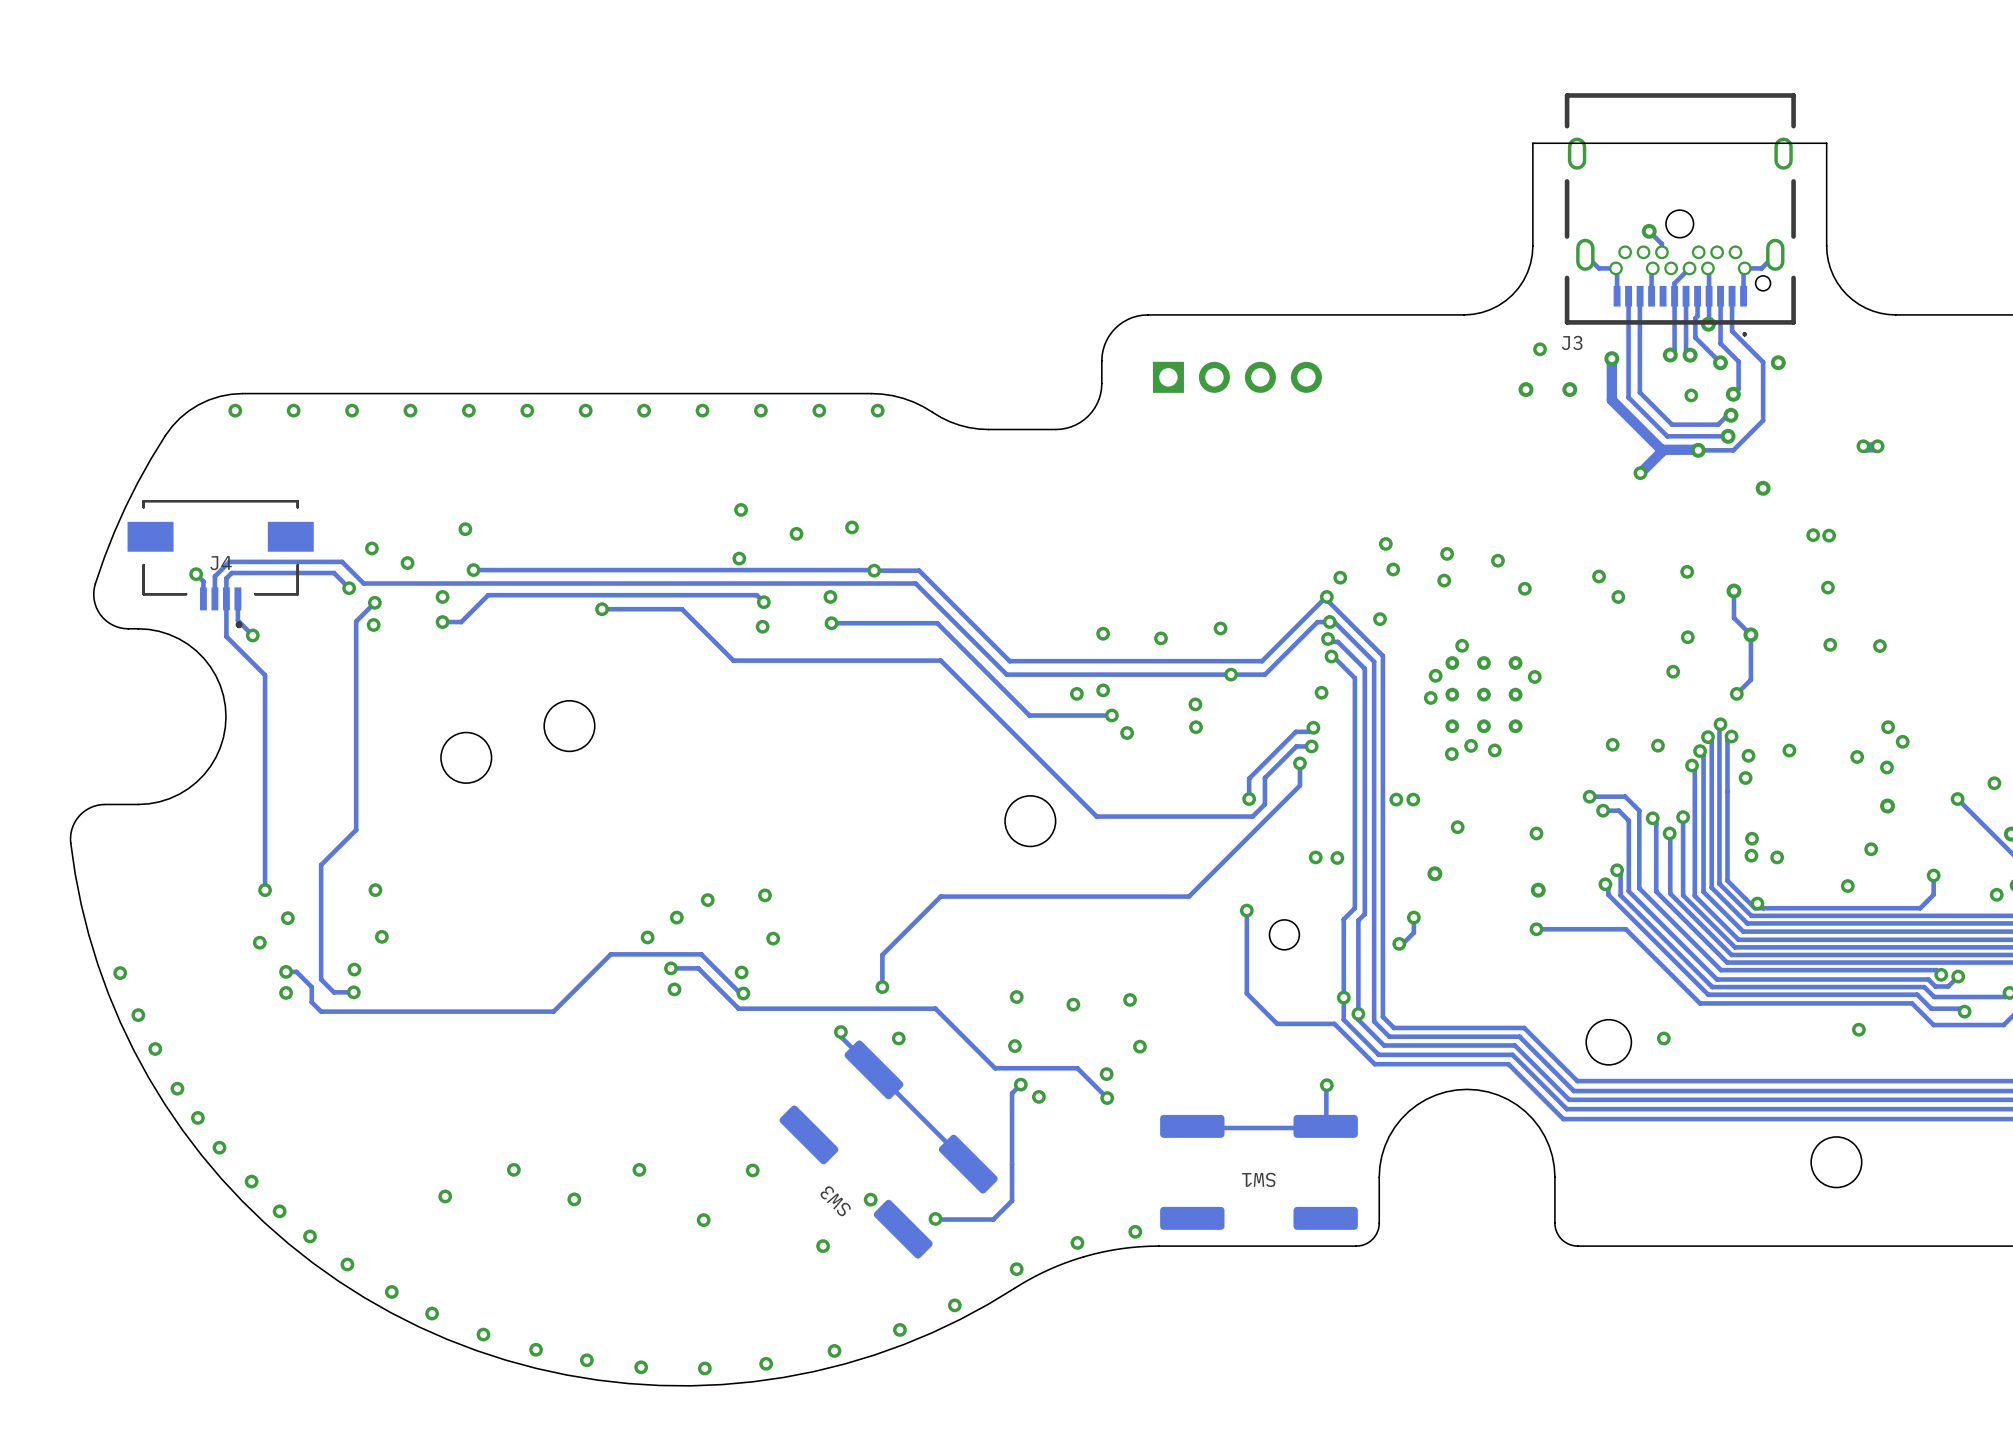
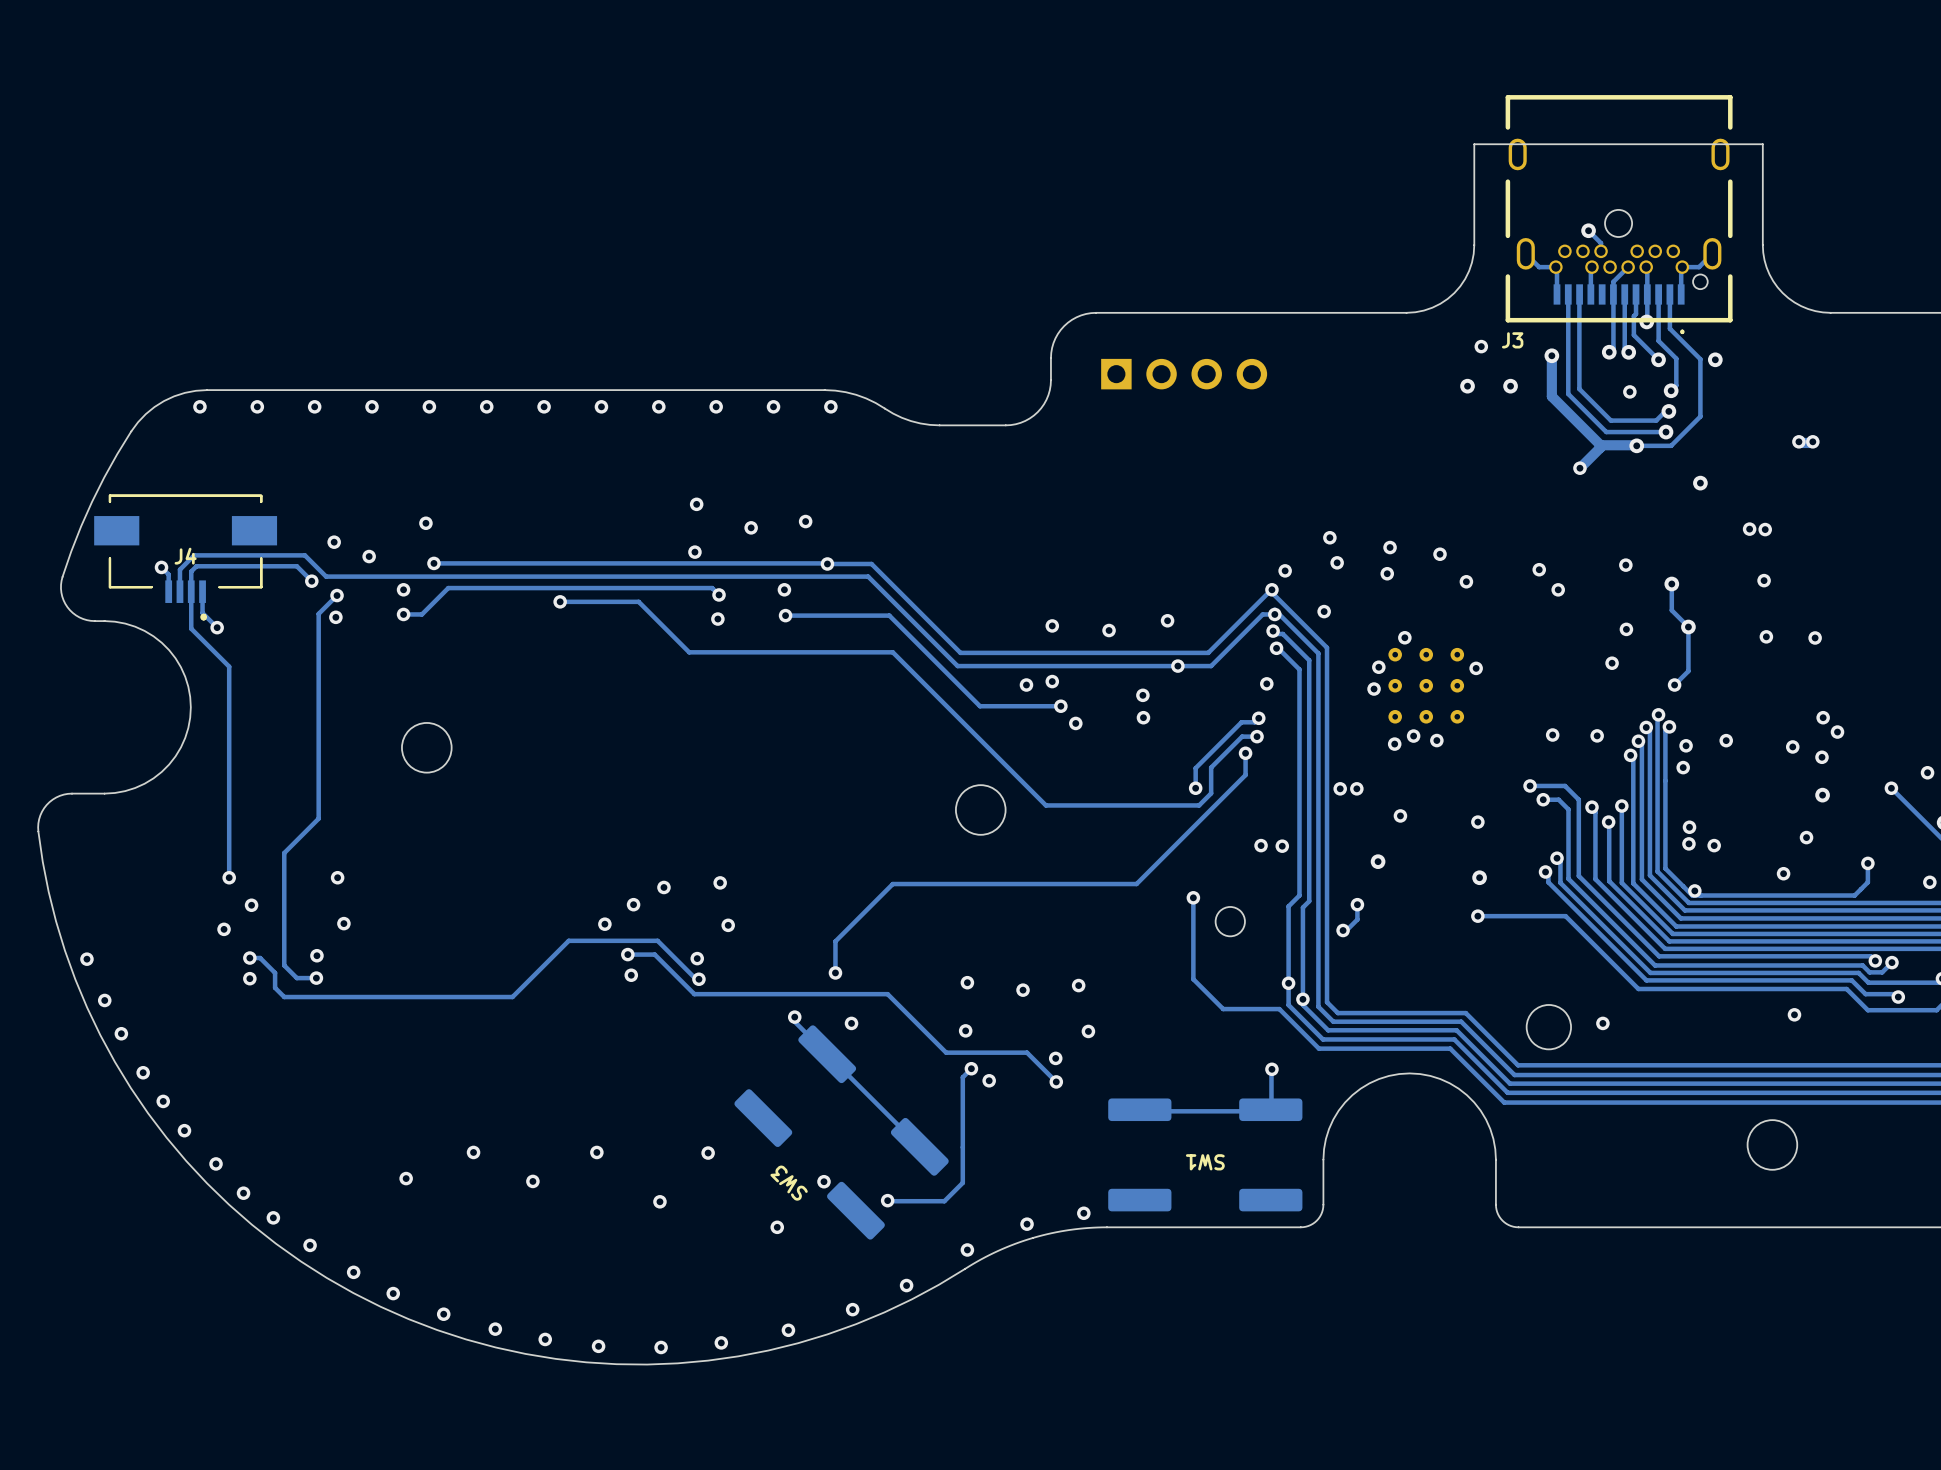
round board edge: [543, 700, 596, 752] -> none

